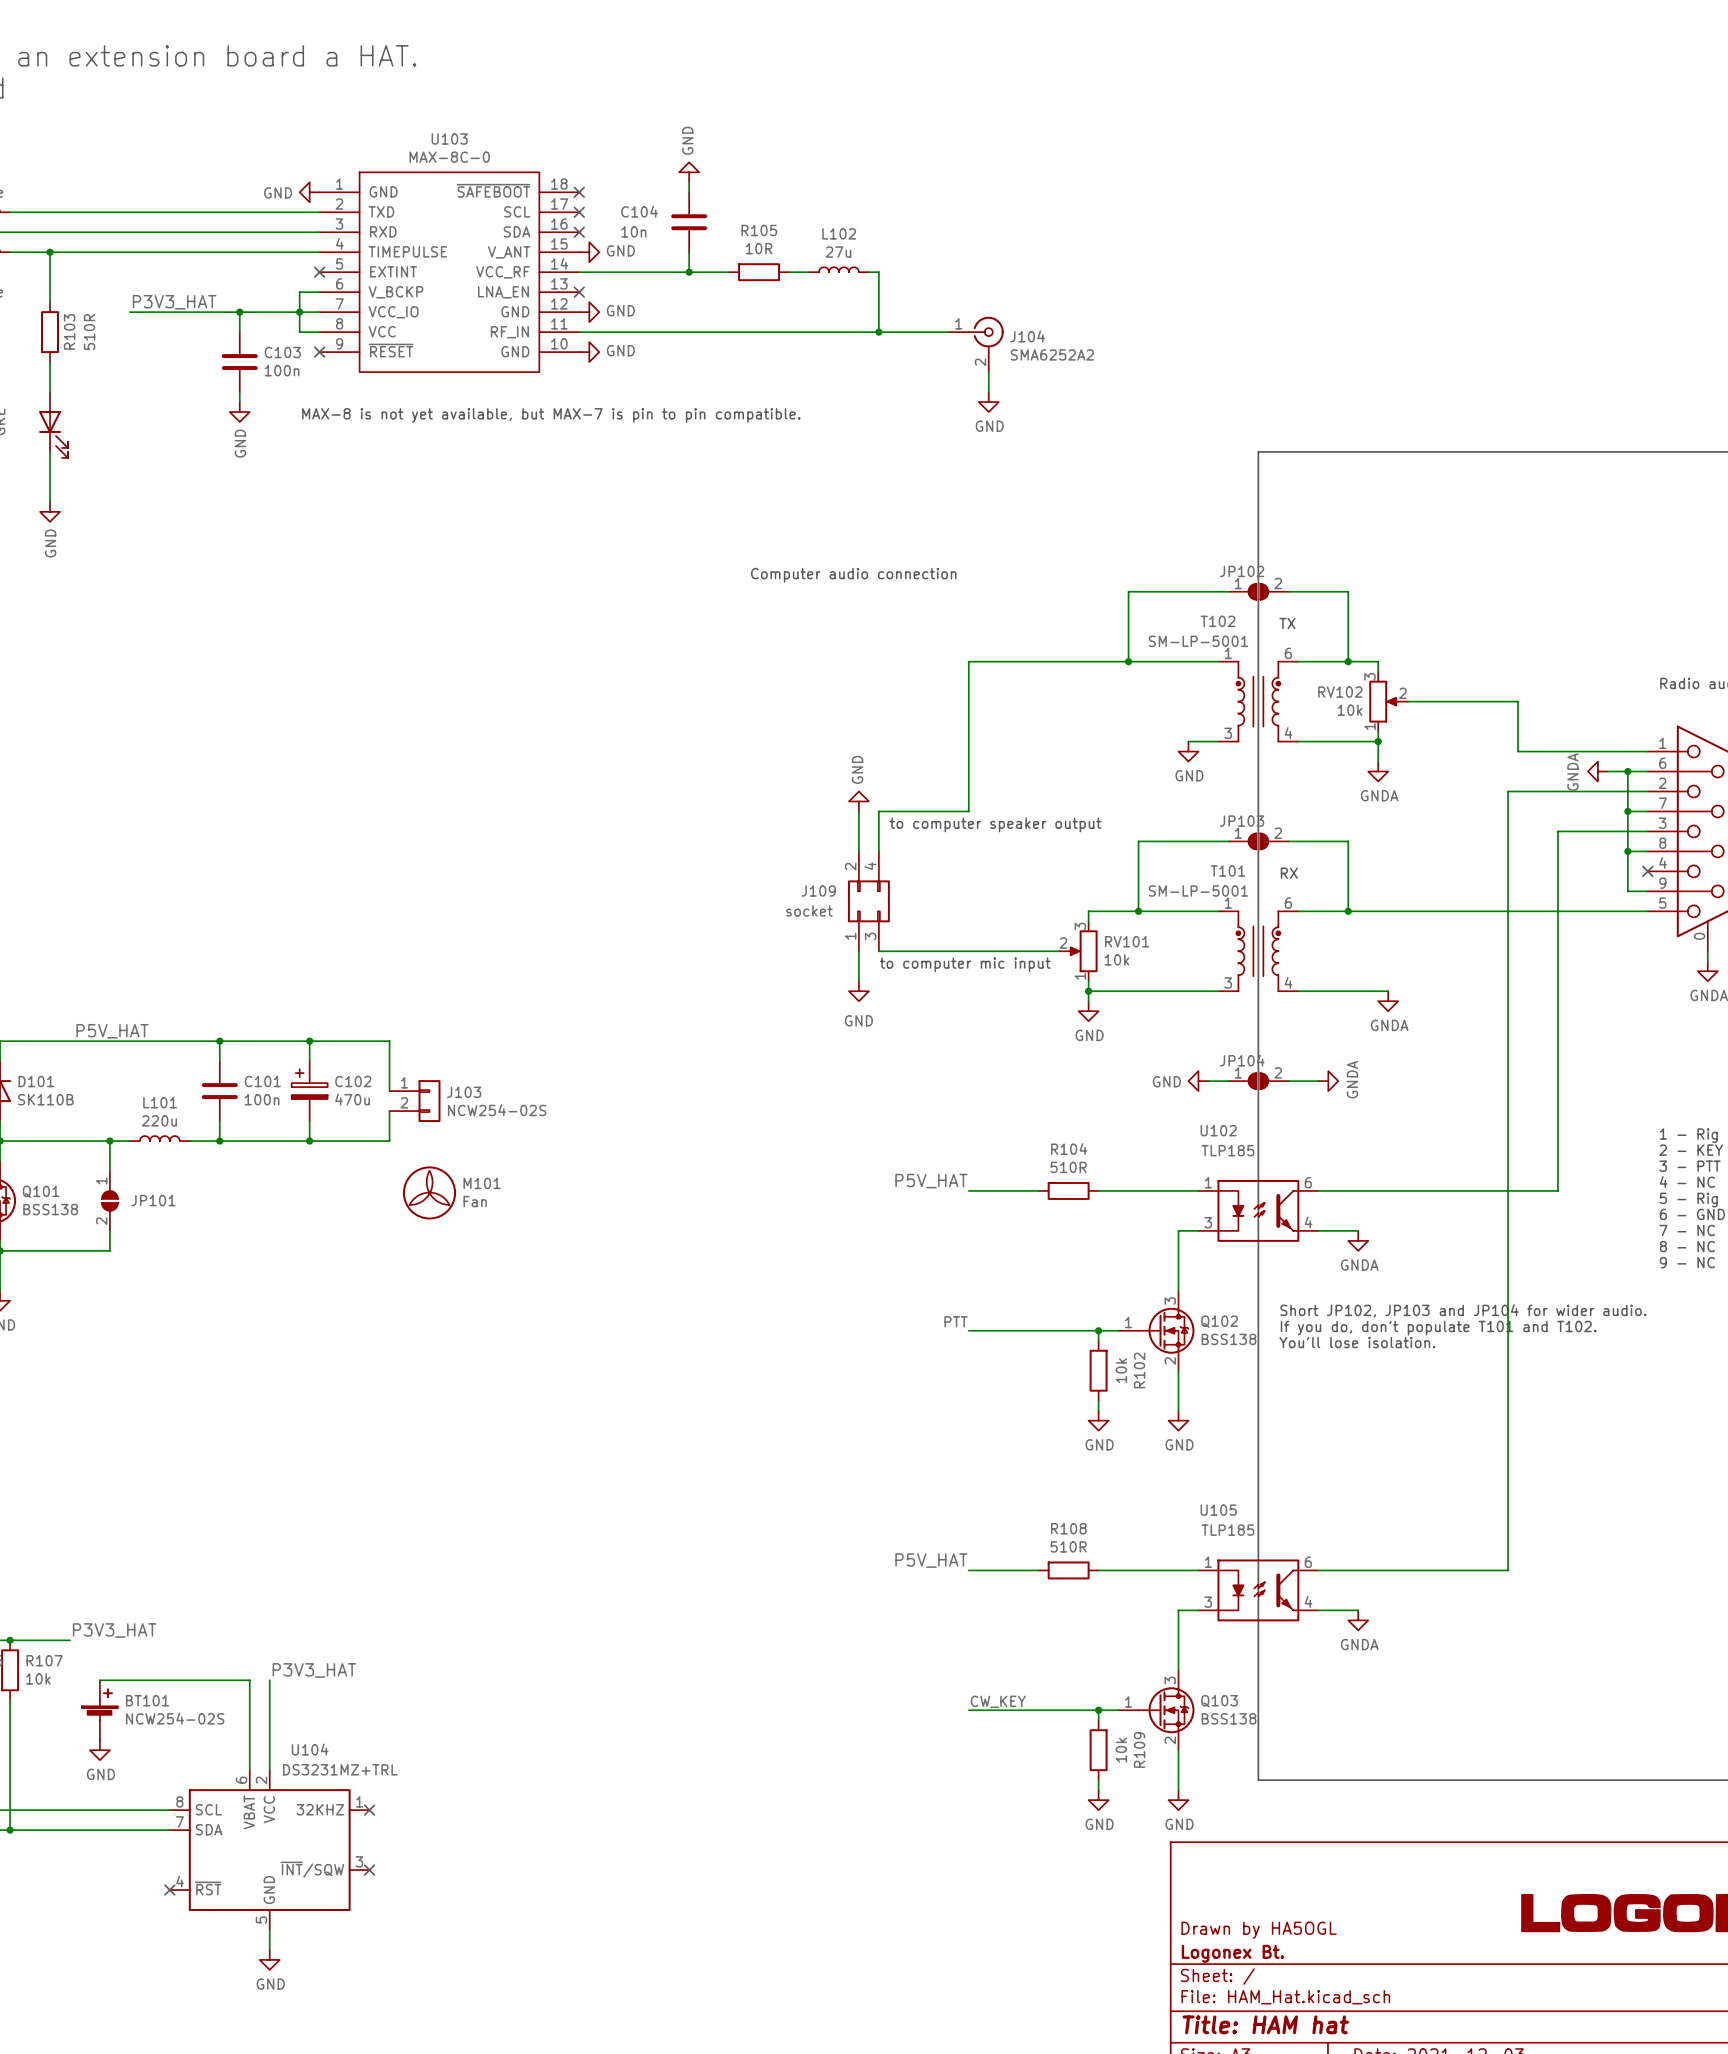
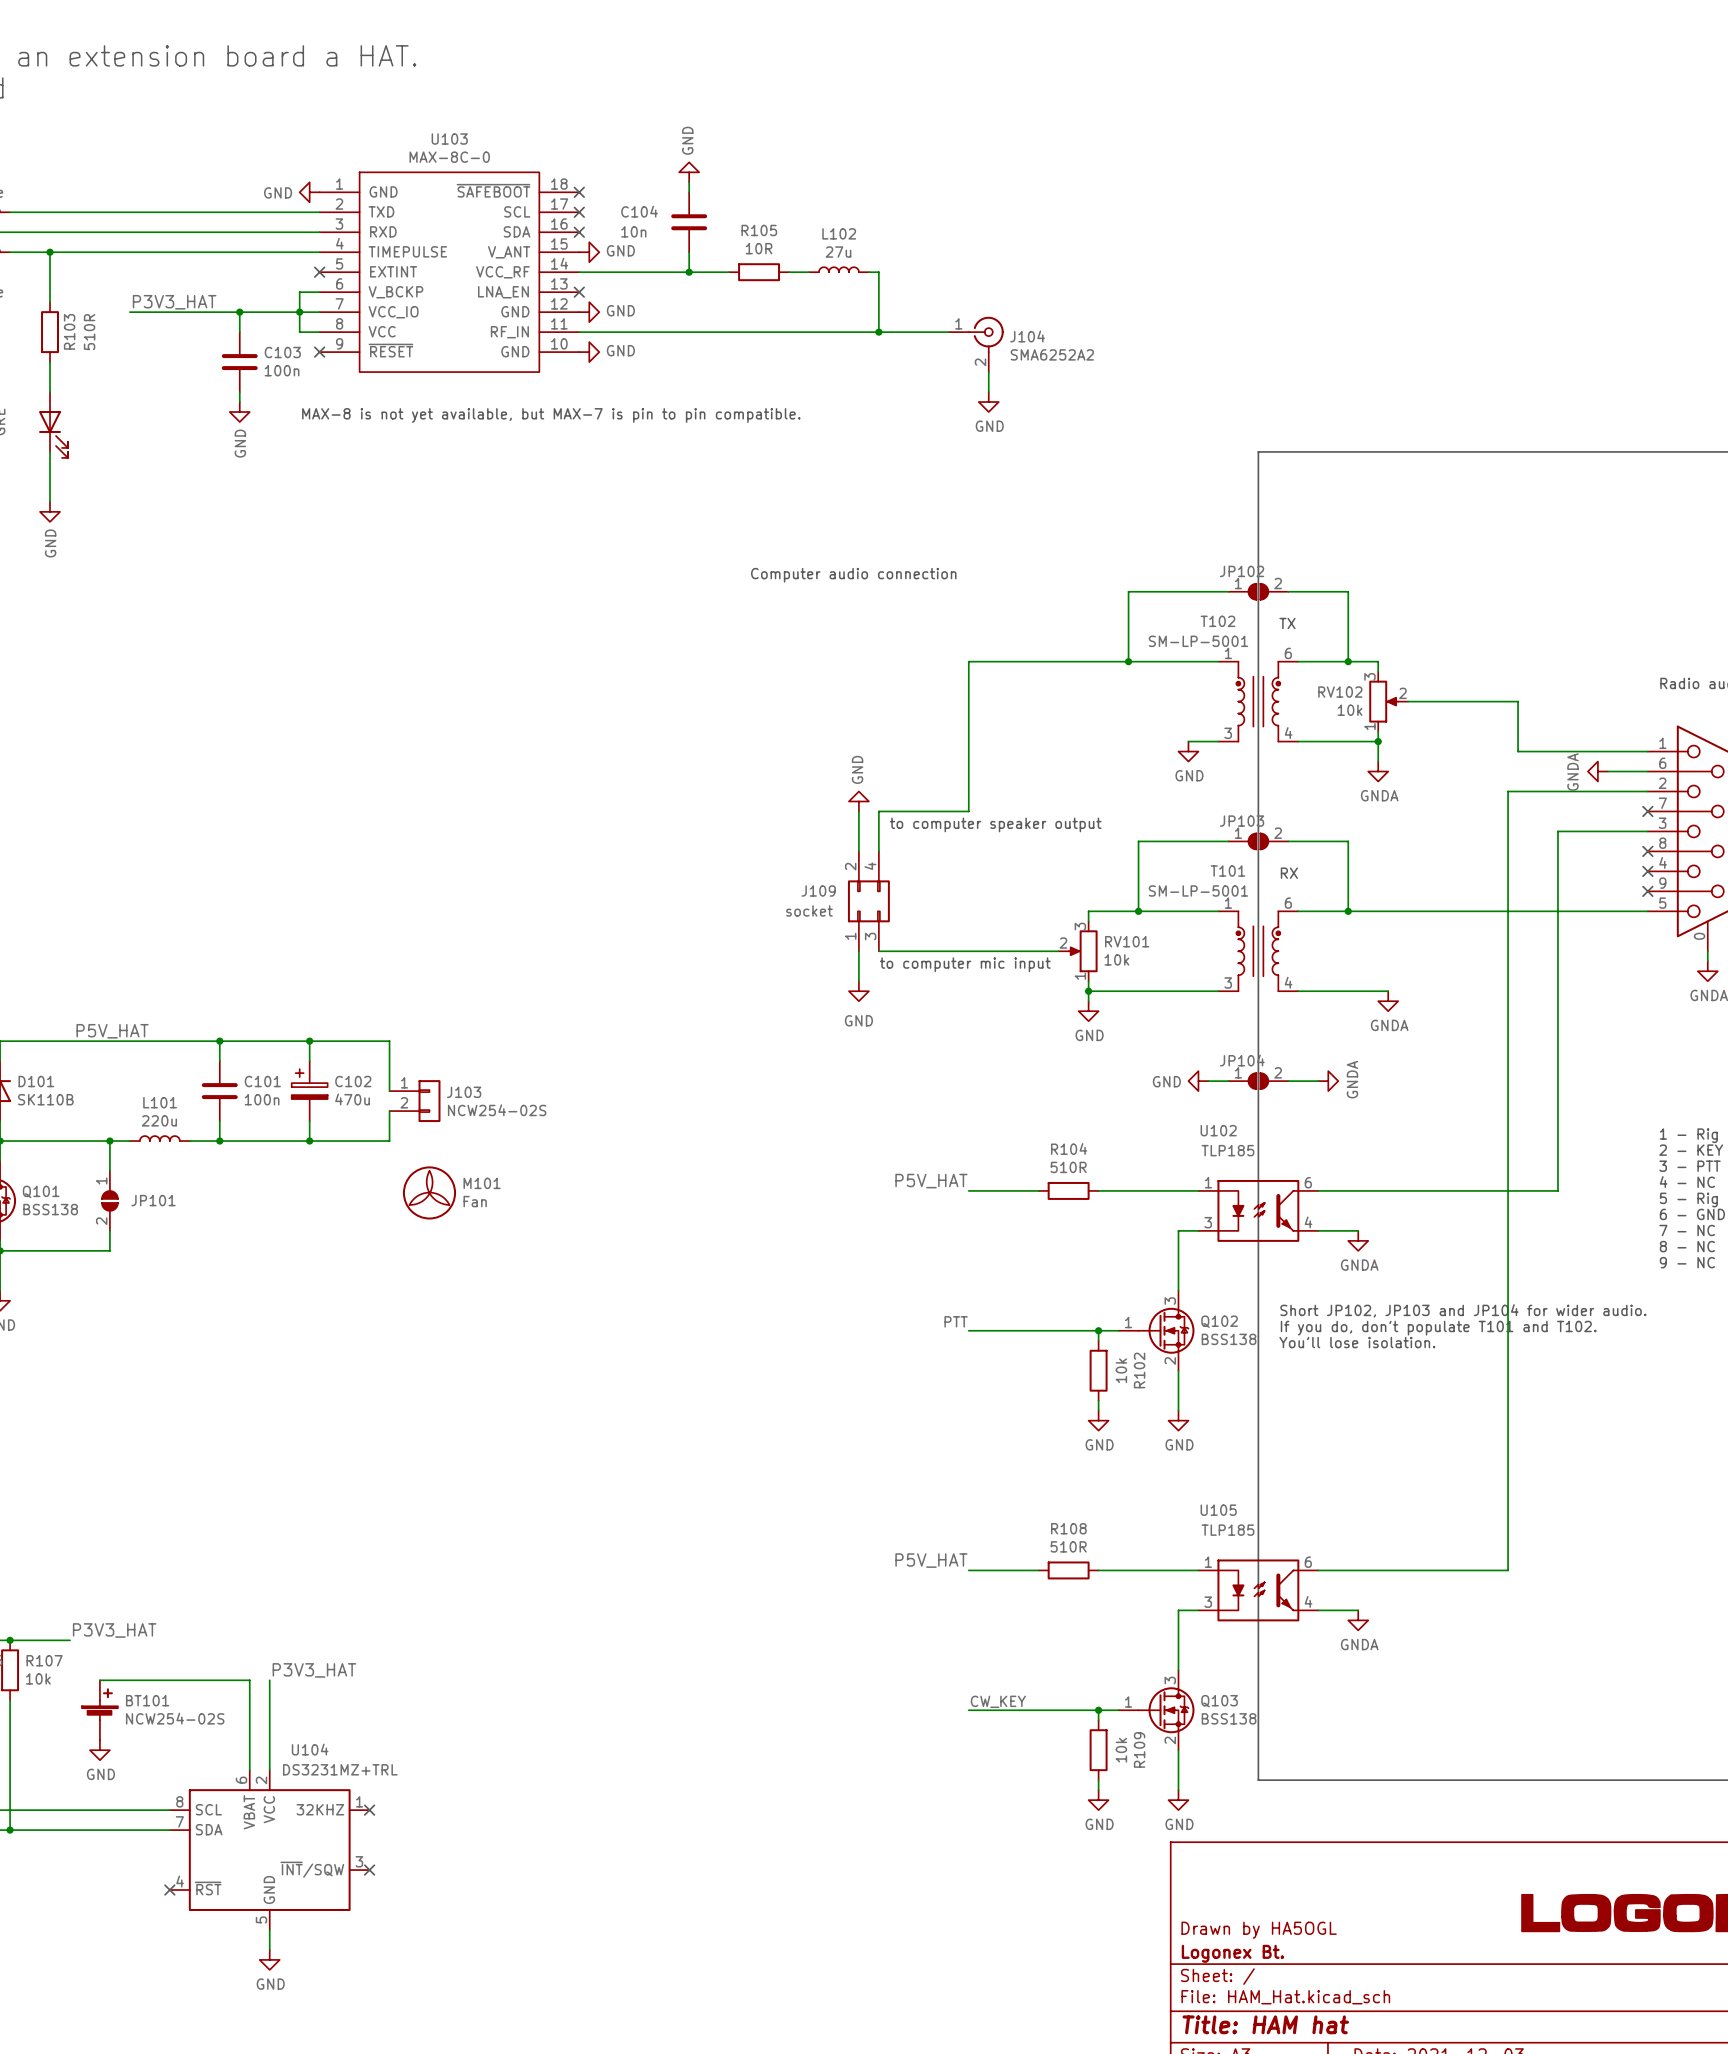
wire: (1627, 771) (1627, 891) (1647, 891) -> none
junction: (1627, 771) -> none
wire: (1627, 811) (1647, 811) -> none
junction: (1627, 811) -> none
no-connect mark: none -> (1647, 811)
wire: (1627, 851) (1647, 851) -> none
junction: (1627, 851) -> none
no-connect mark: none -> (1647, 851)
no-connect mark: none -> (1647, 891)

